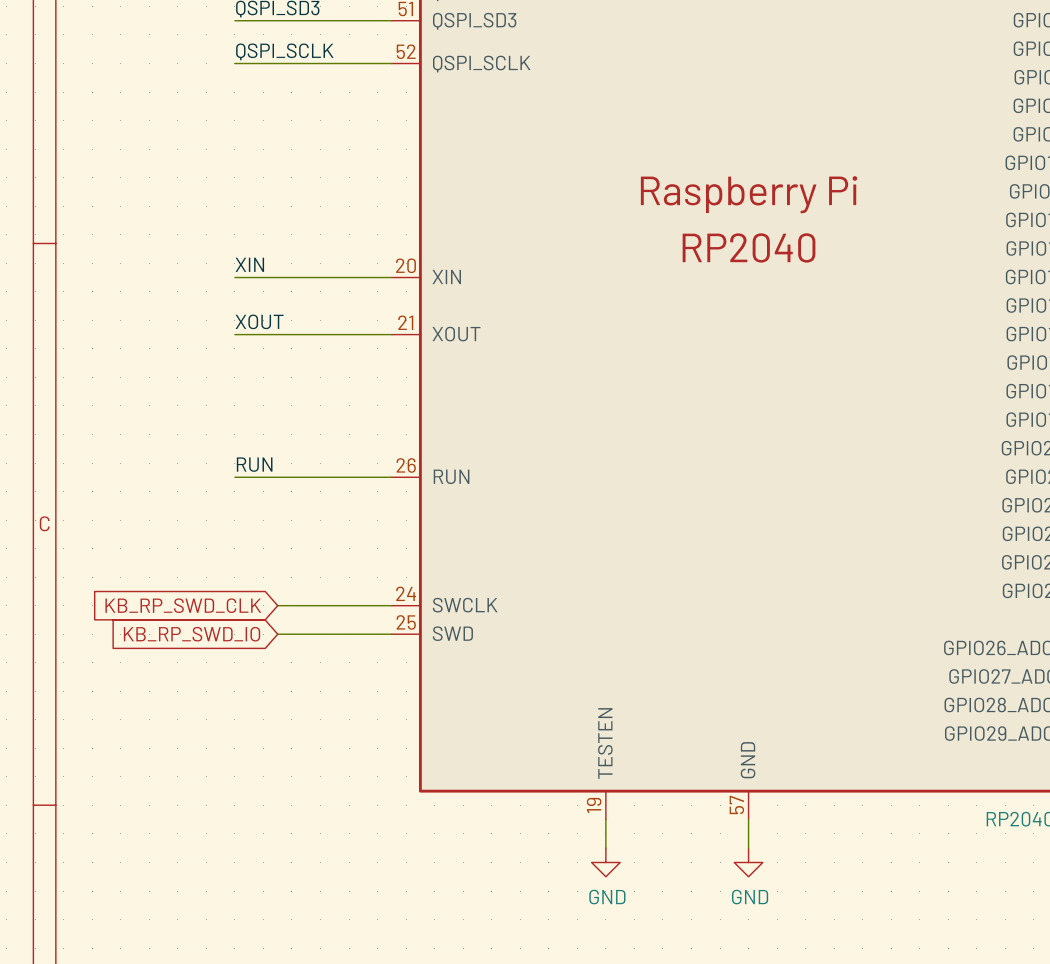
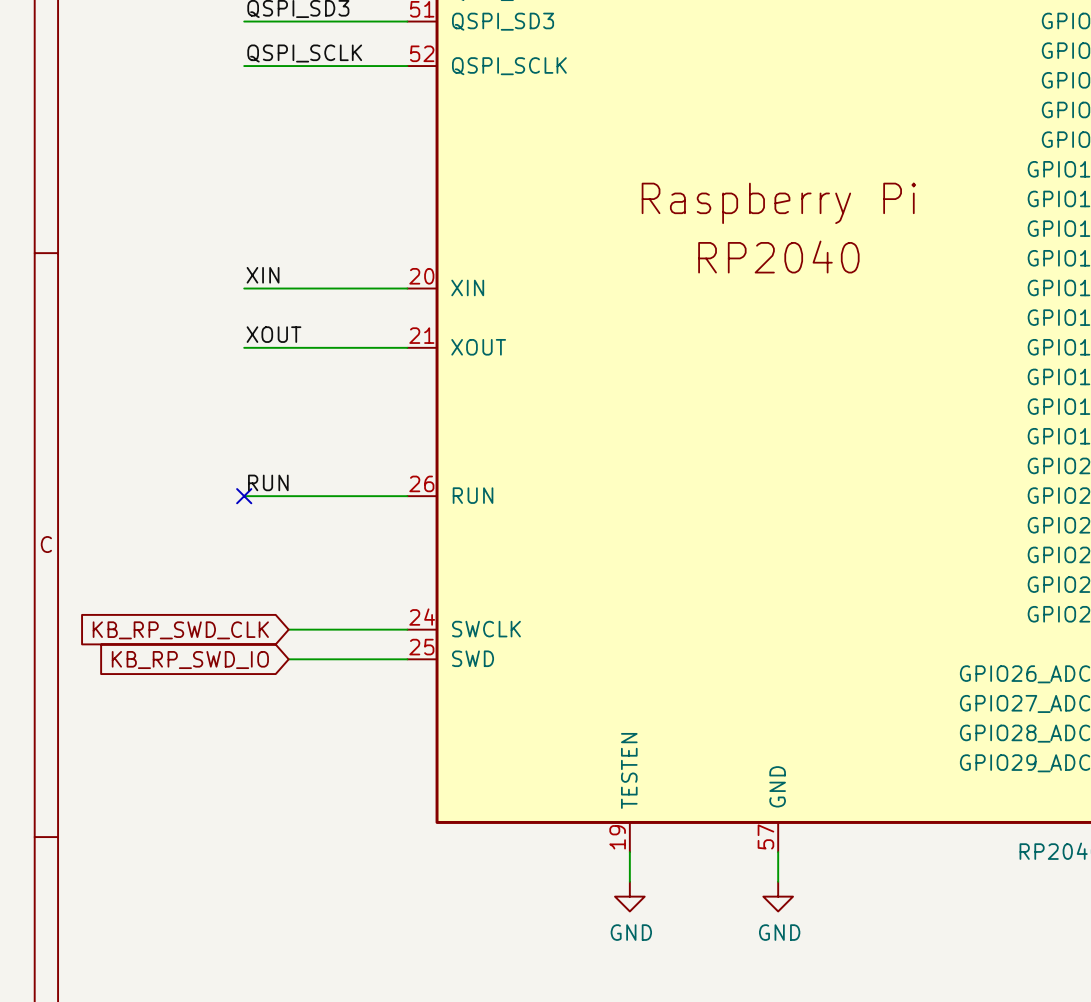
no-connect mark: none -> (244, 496)

